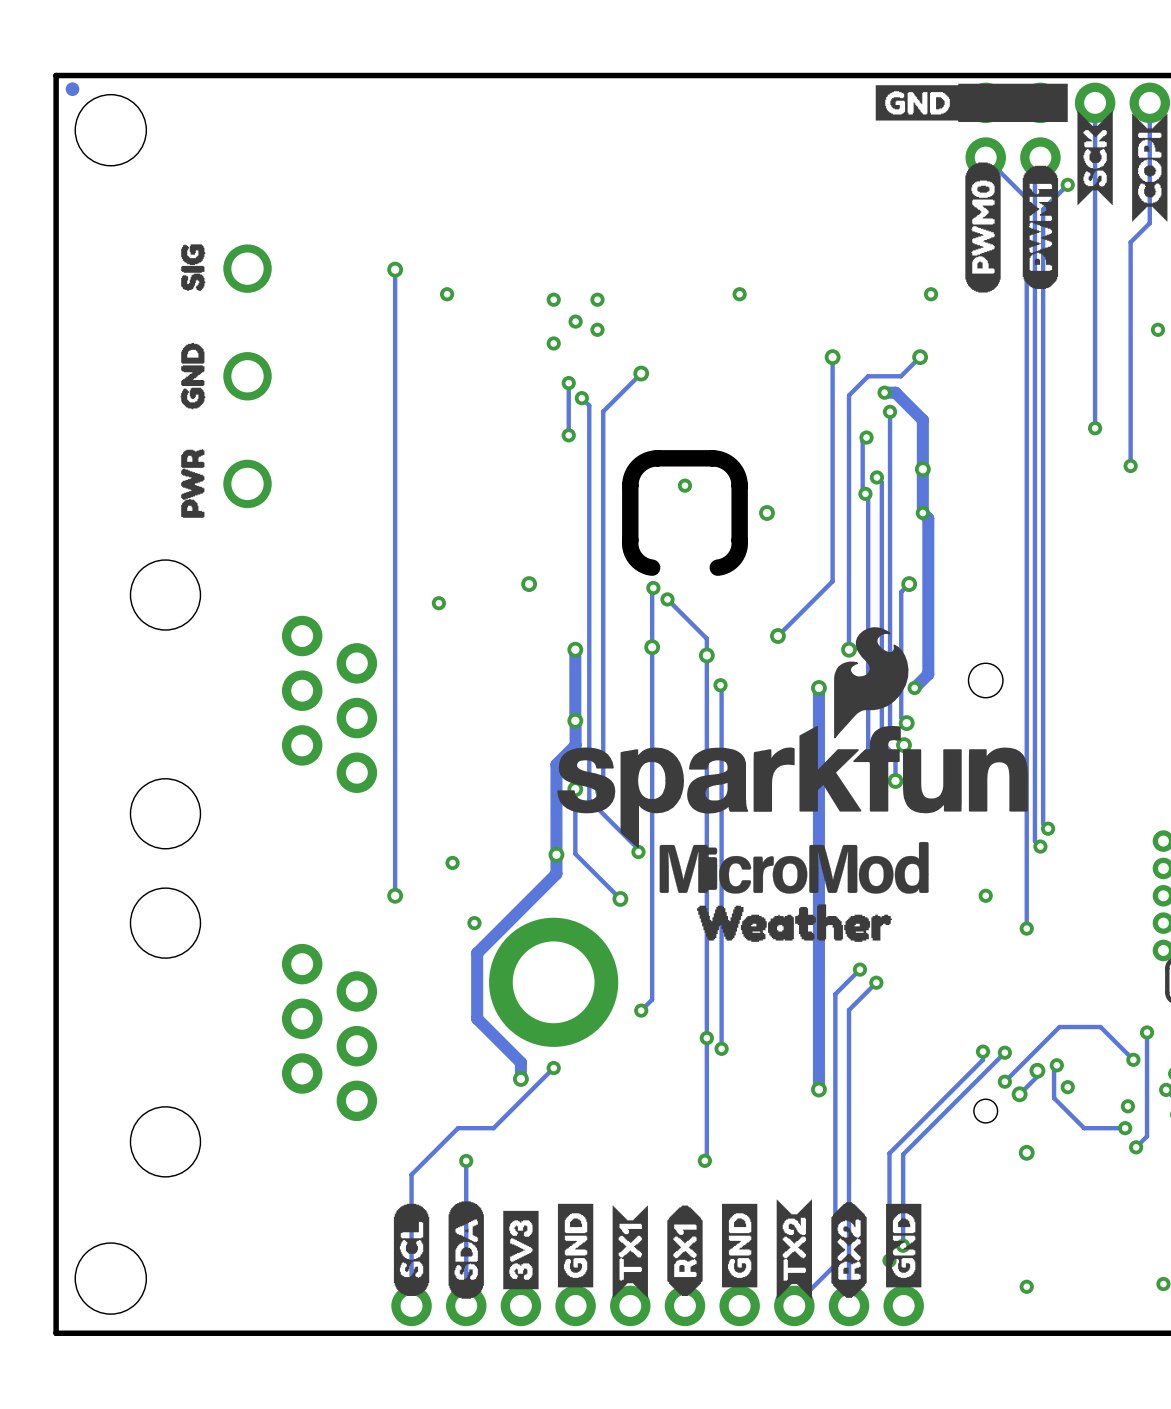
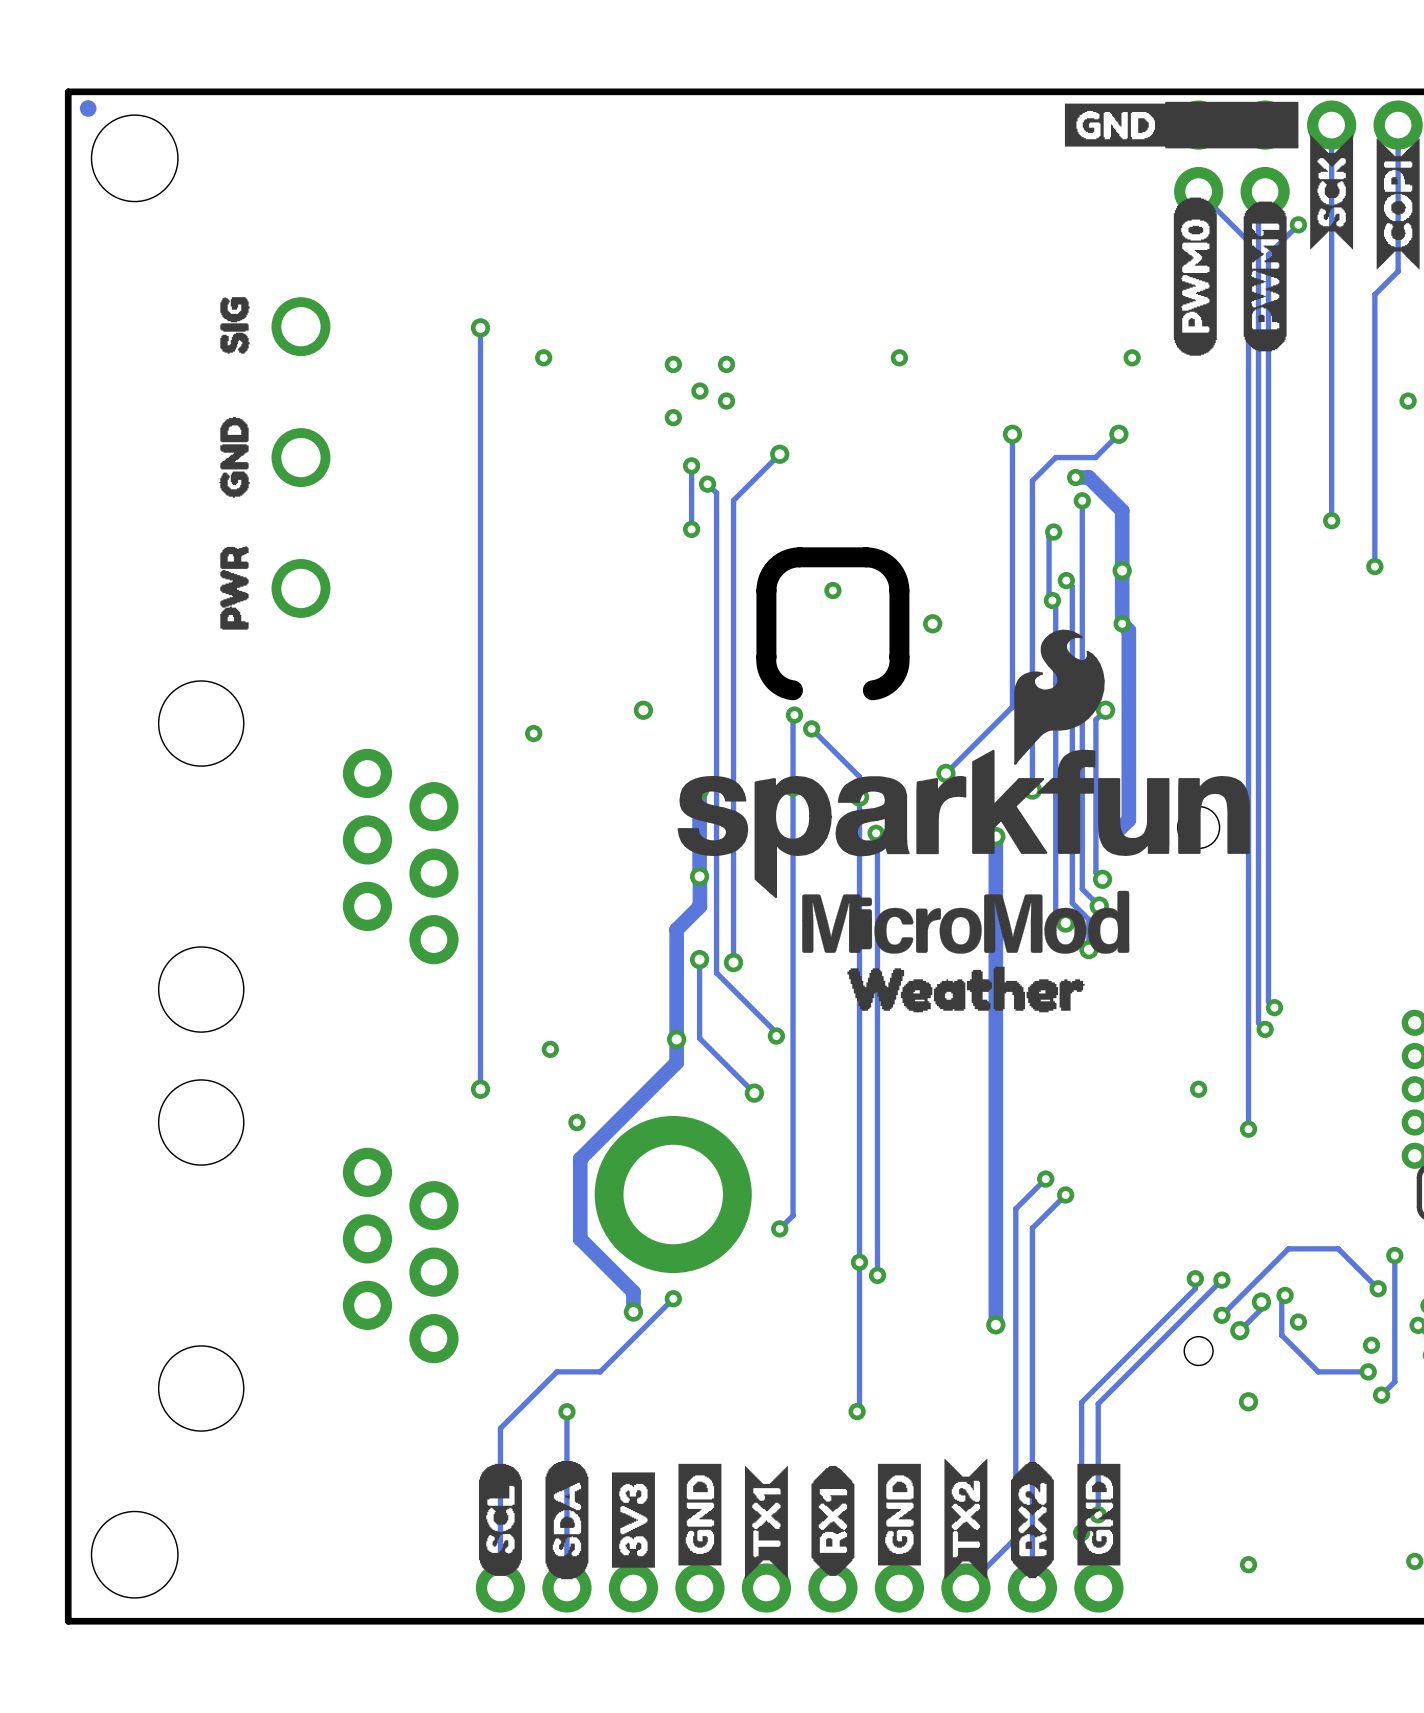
drawing position: (792, 737) -> (963, 763)
drawing position: (794, 867) -> (965, 922)
drawing position: (794, 923) -> (966, 989)

